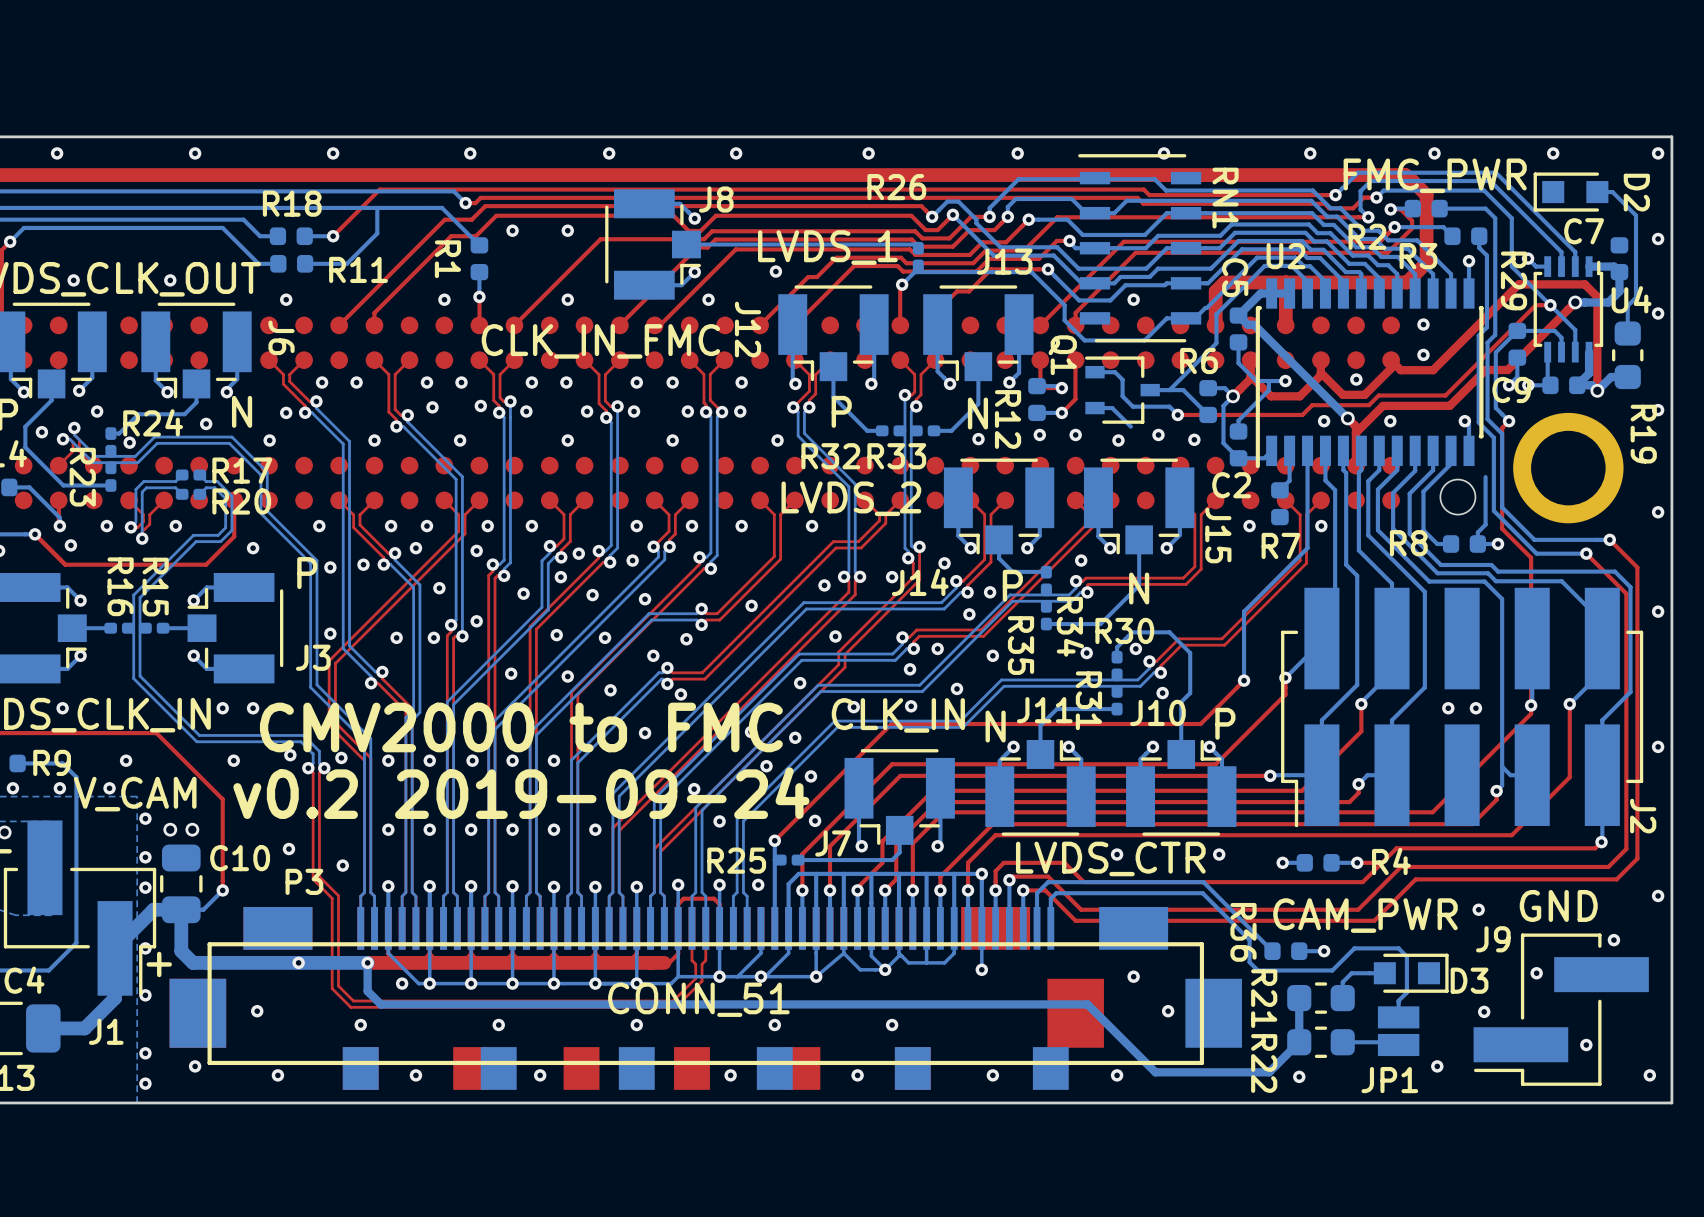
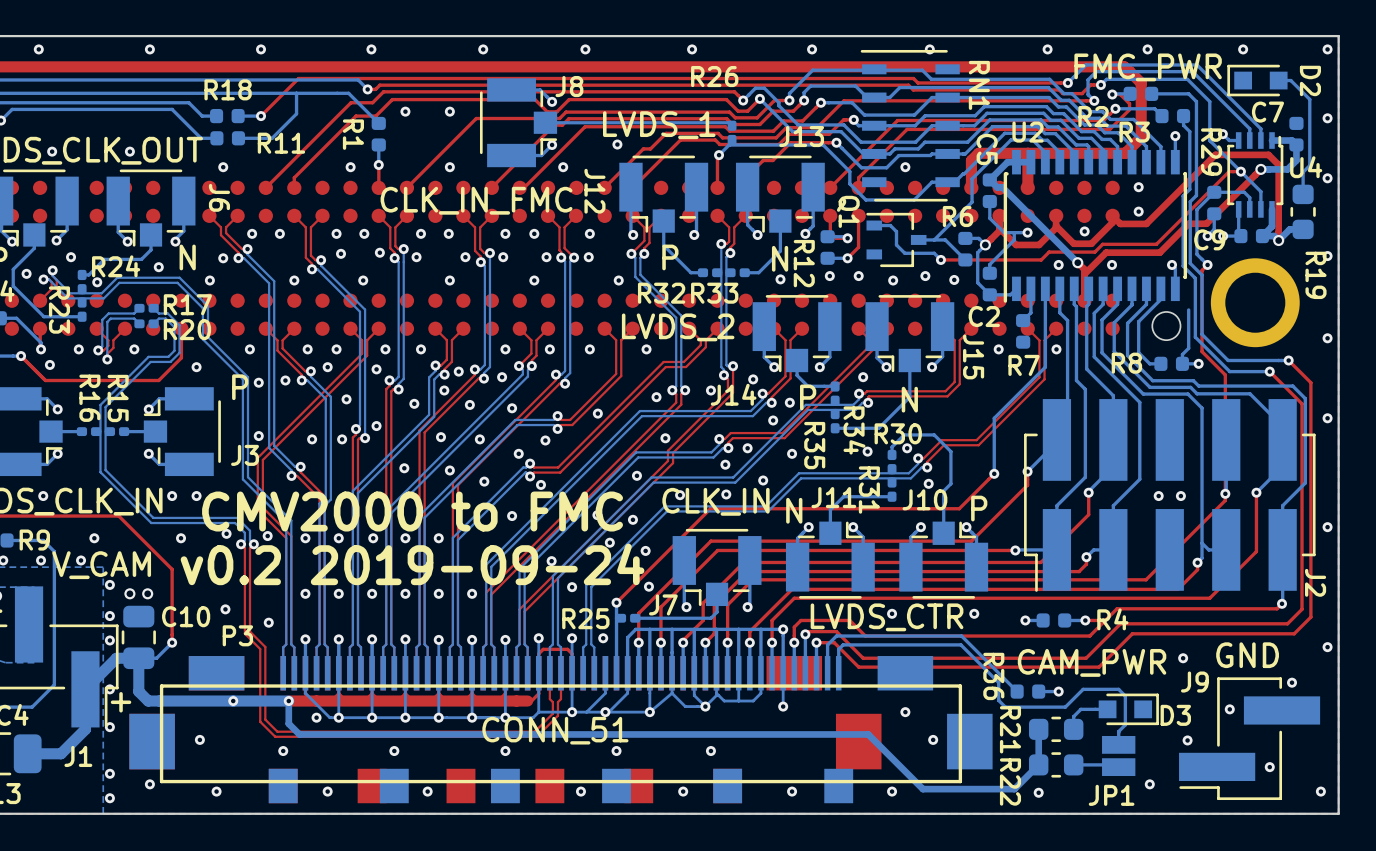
bottom track: (1094, 408) (1112, 408) (1130, 426) -> none

